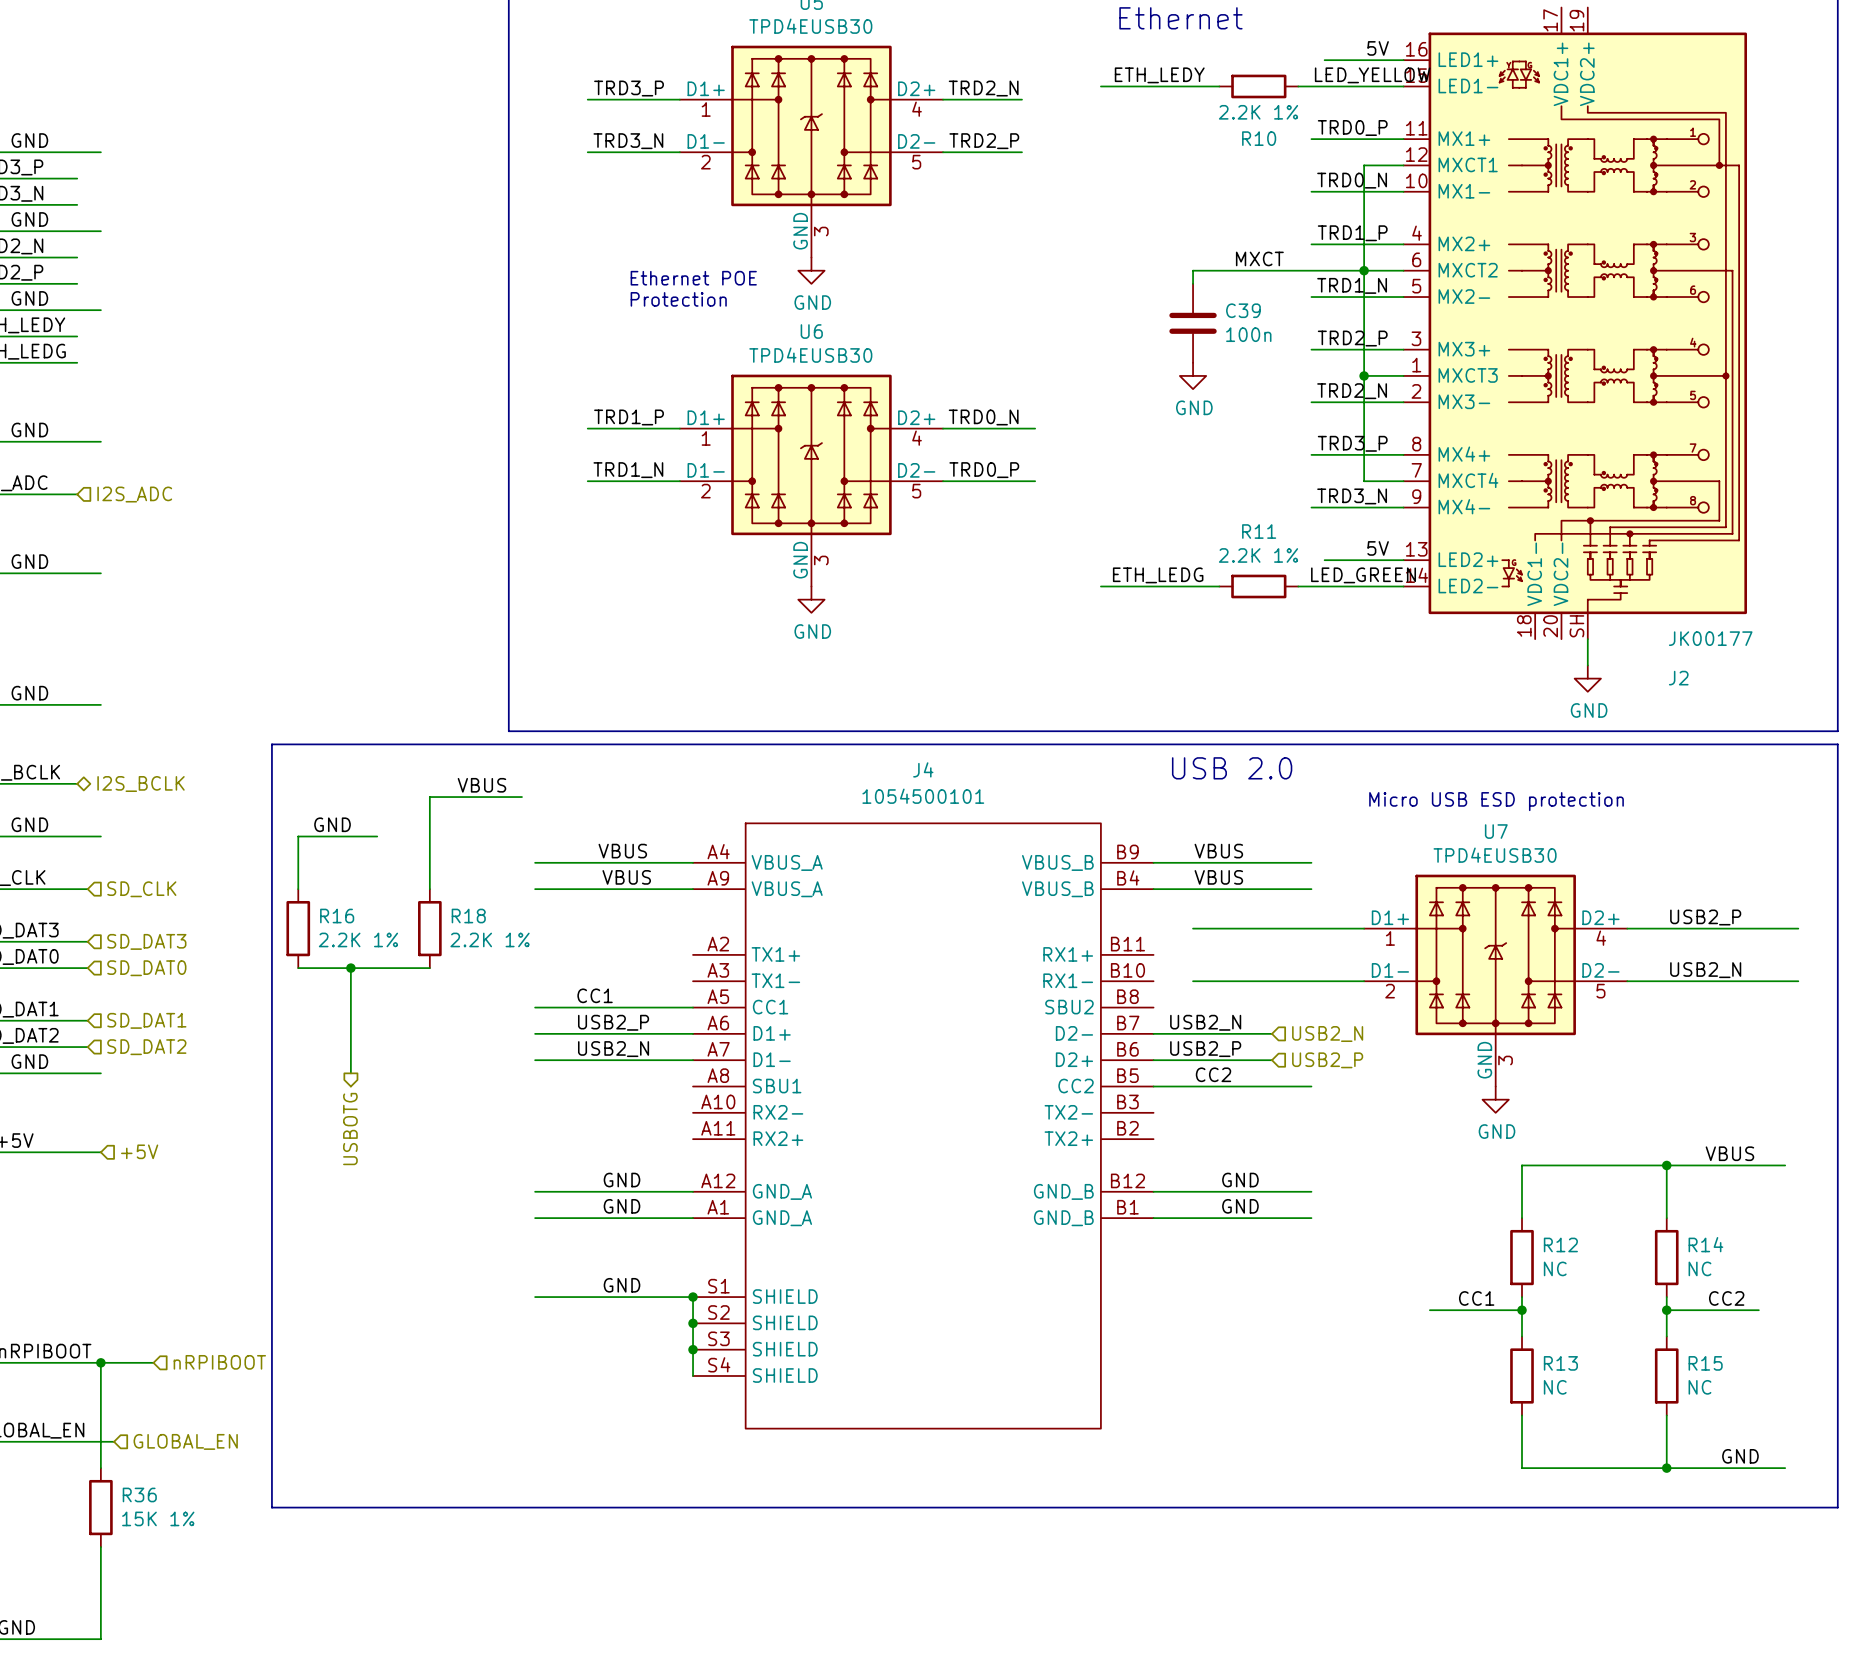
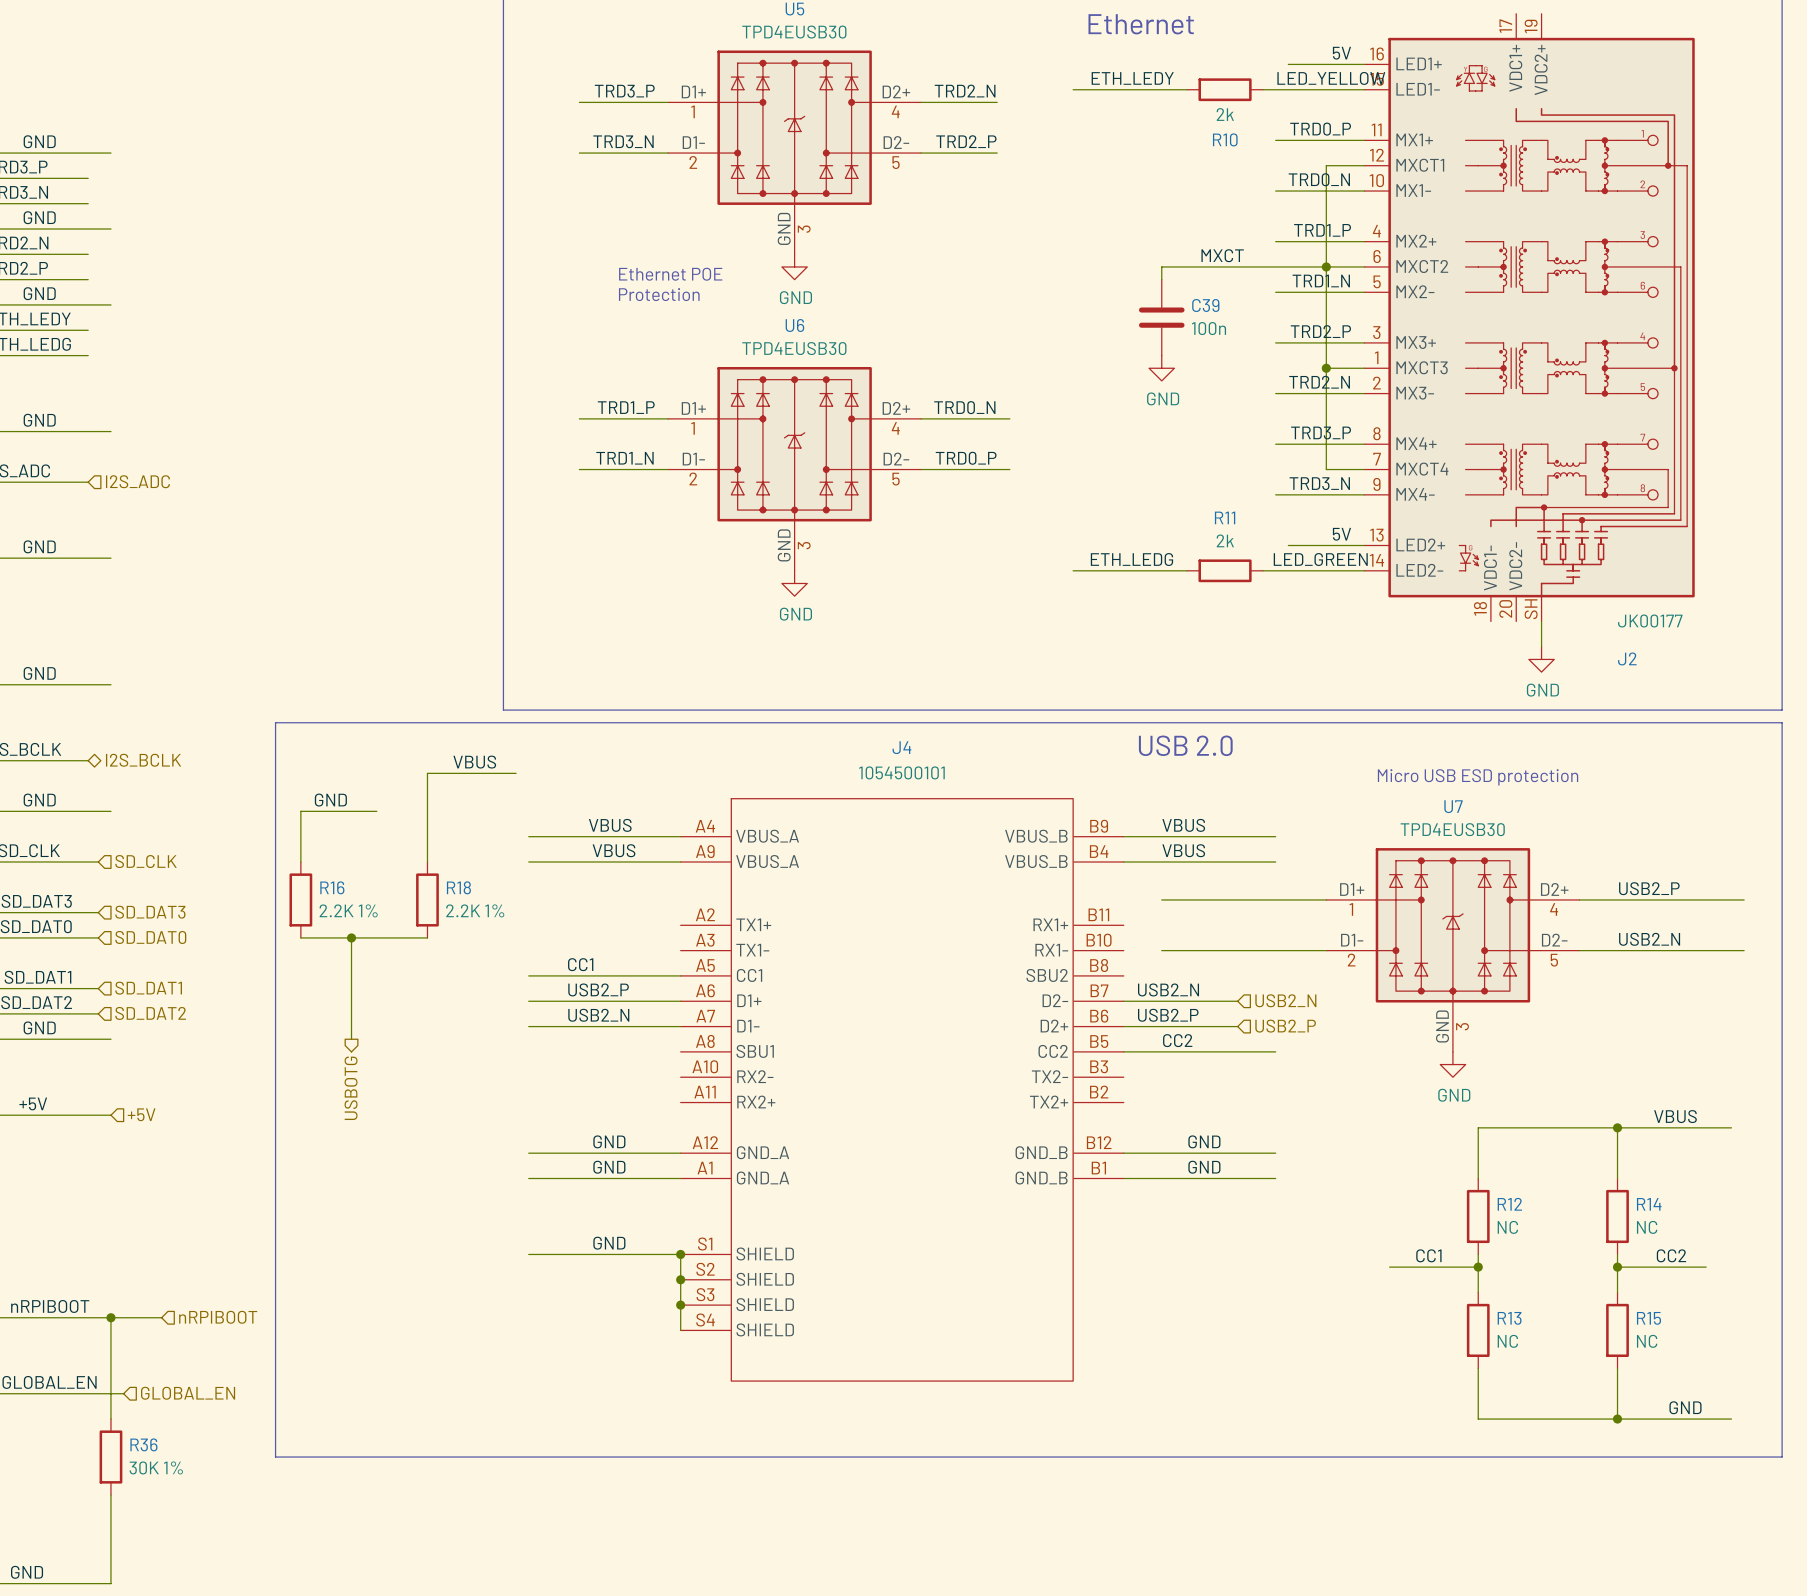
R10 value: 2.2K 1% (1258, 112) -> 2k (1225, 114)
R11 value: 2.2K 1% (1258, 555) -> 2k (1225, 540)
R36 value: 15K 1% (158, 1518) -> 30K 1% (156, 1467)

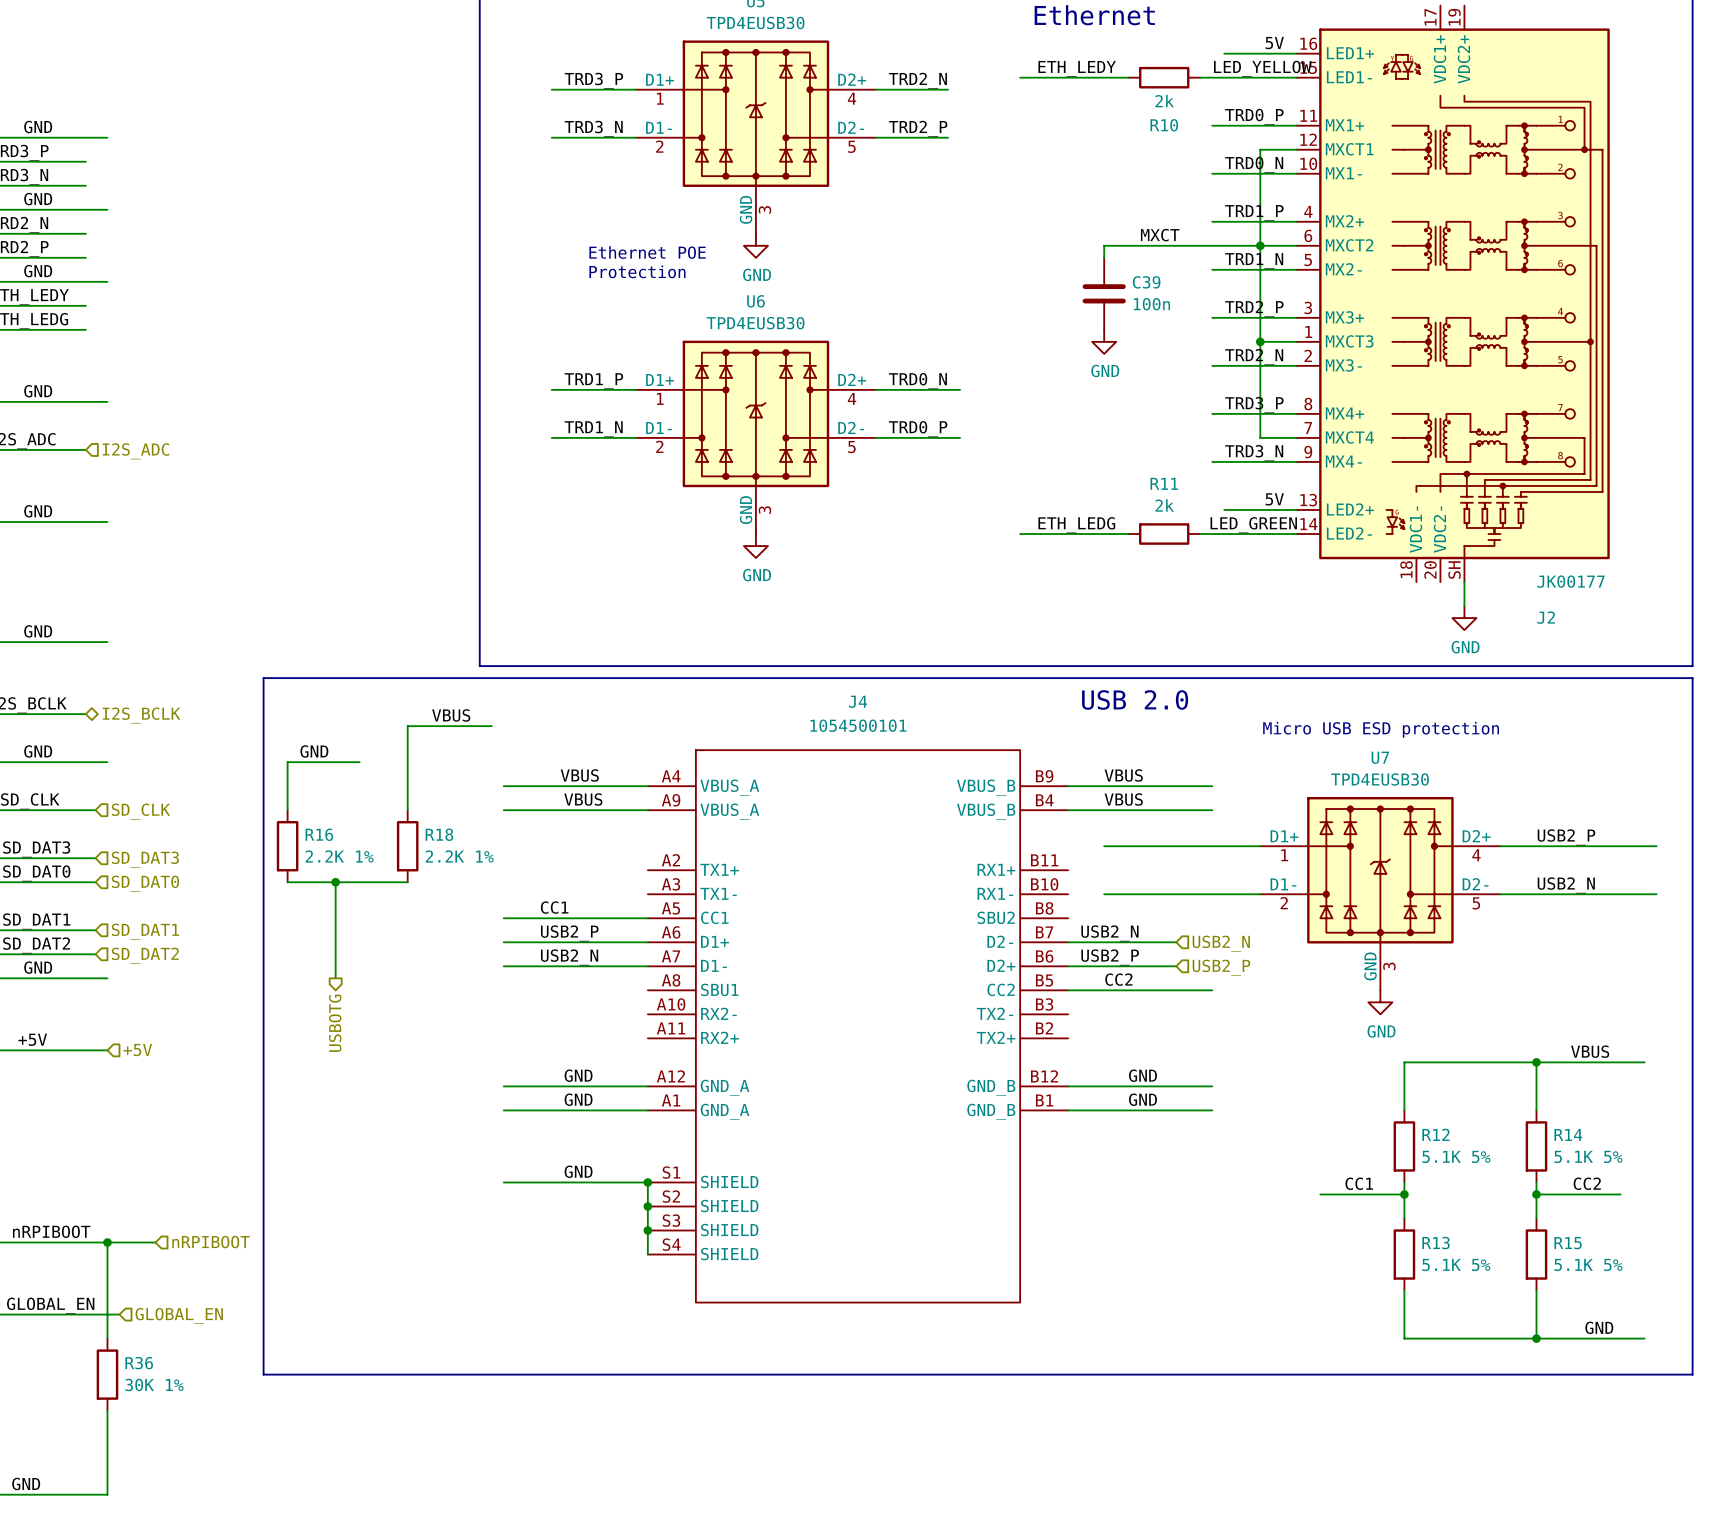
R12 value: NC (1507, 1227) -> 5.1K 5% (1456, 1156)
R14 value: NC (1647, 1227) -> 5.1K 5% (1588, 1156)
R13 value: NC (1507, 1341) -> 5.1K 5% (1456, 1265)
R15 value: NC (1647, 1341) -> 5.1K 5% (1588, 1265)

